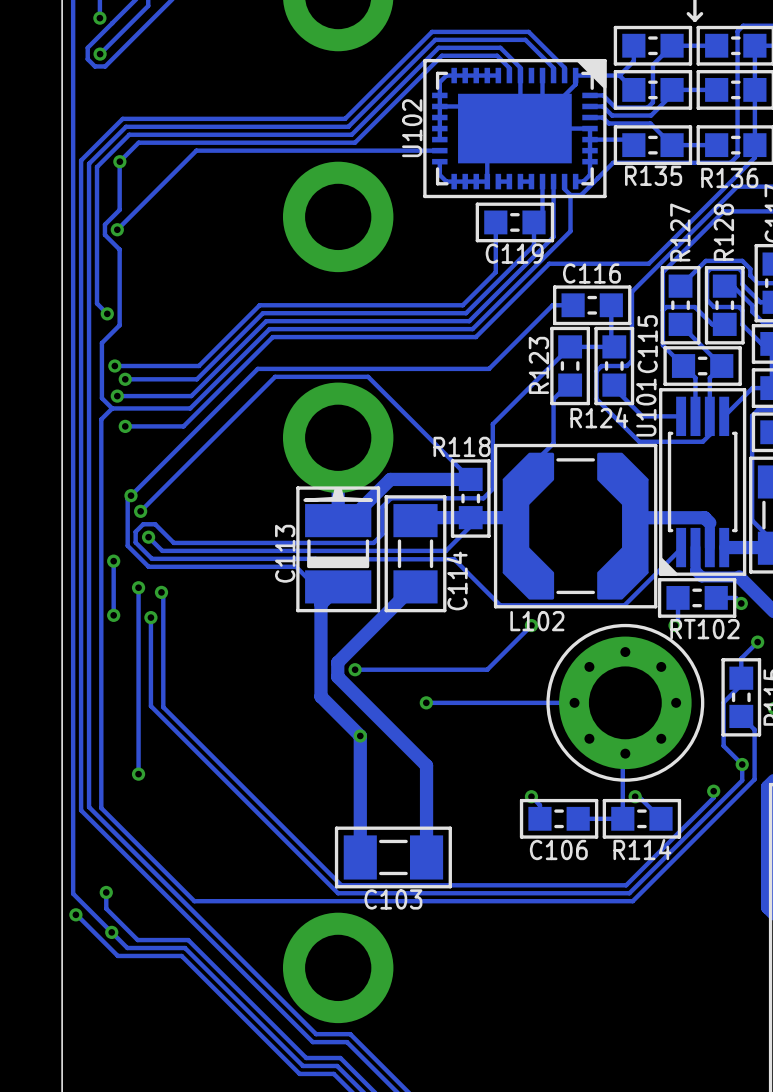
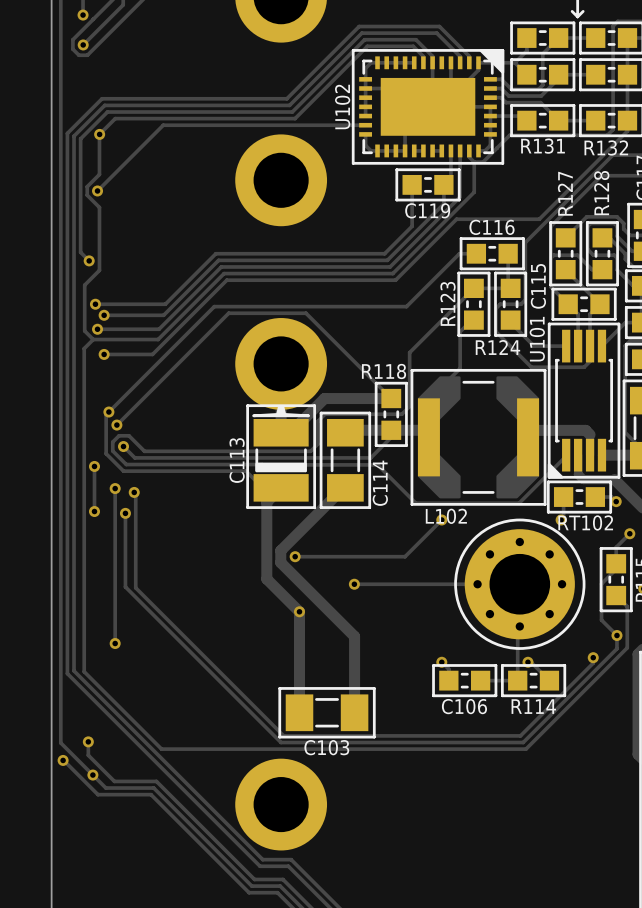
R135 name: R135 (653, 175) -> R131 (543, 146)
R136 name: R136 (729, 177) -> R132 (606, 147)

